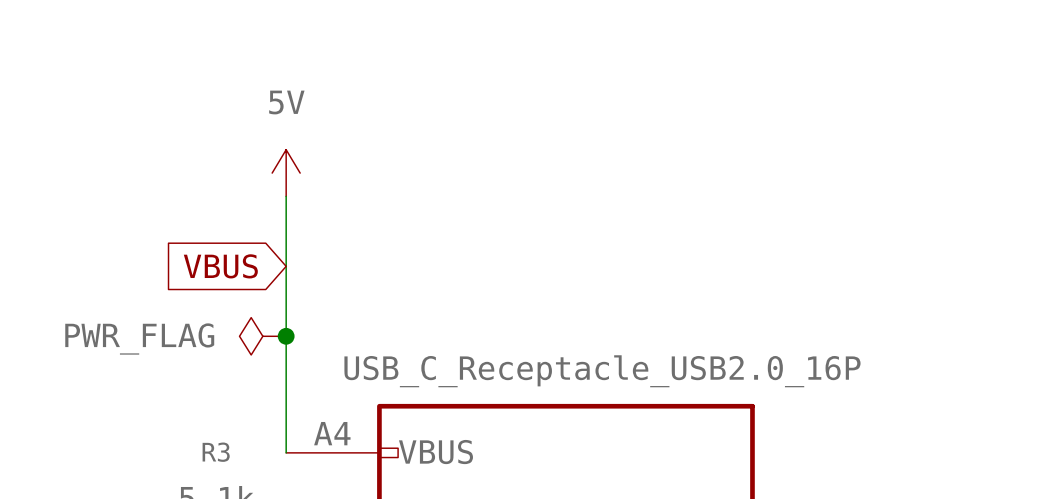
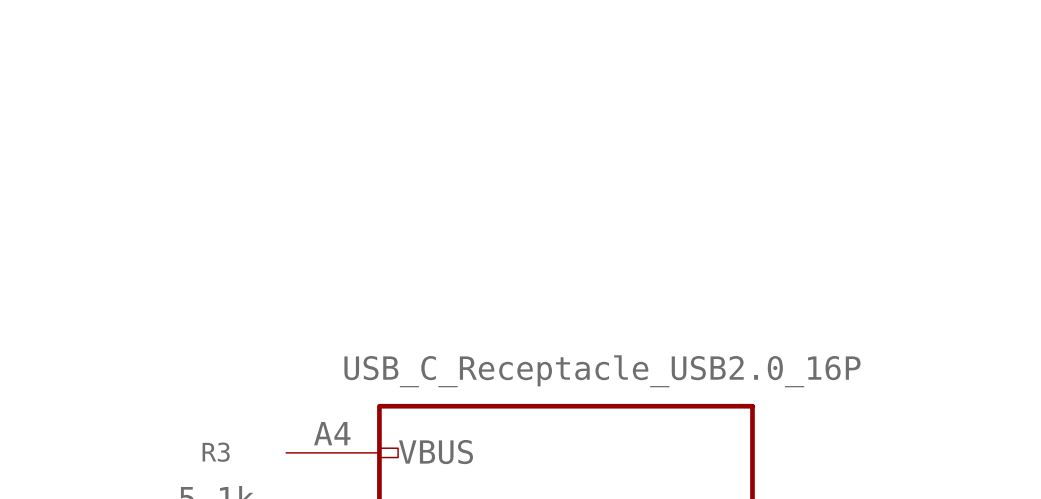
power symbol: 5V (286, 173) -> none
wire: (286, 196) (286, 452) -> none
global label: VBUS (220, 266) -> none
power symbol: PWR_FLAG (262, 336) -> none
junction: (286, 336) -> none

